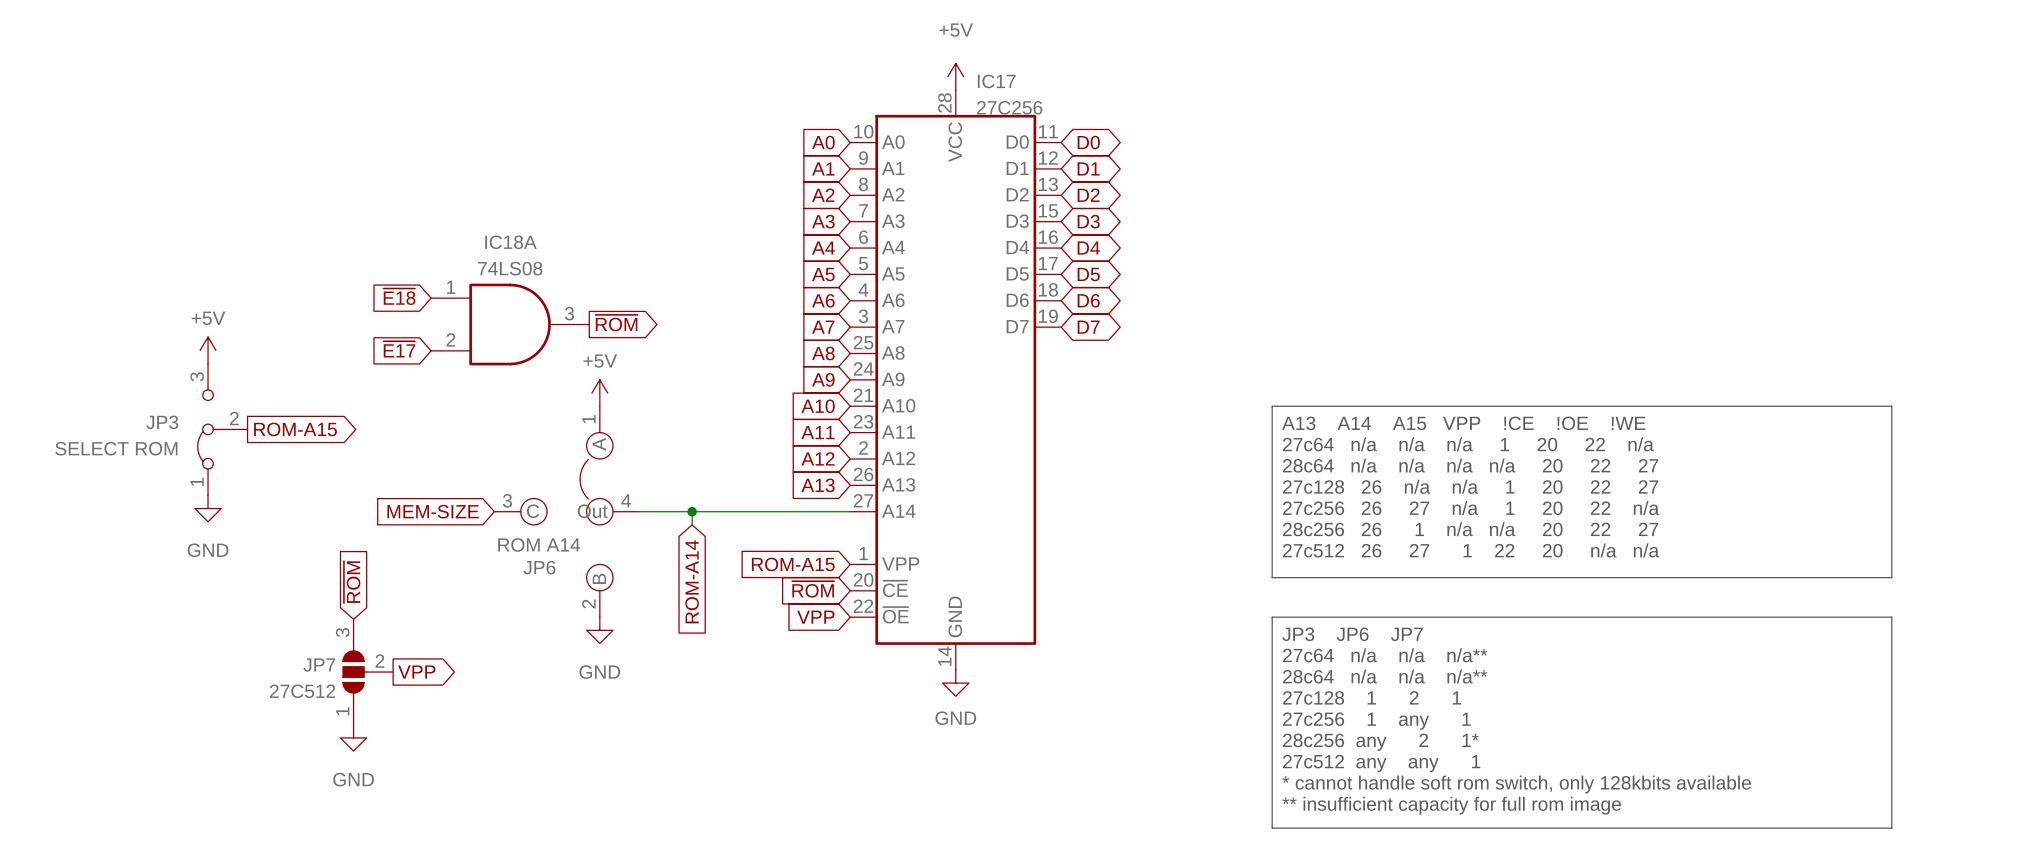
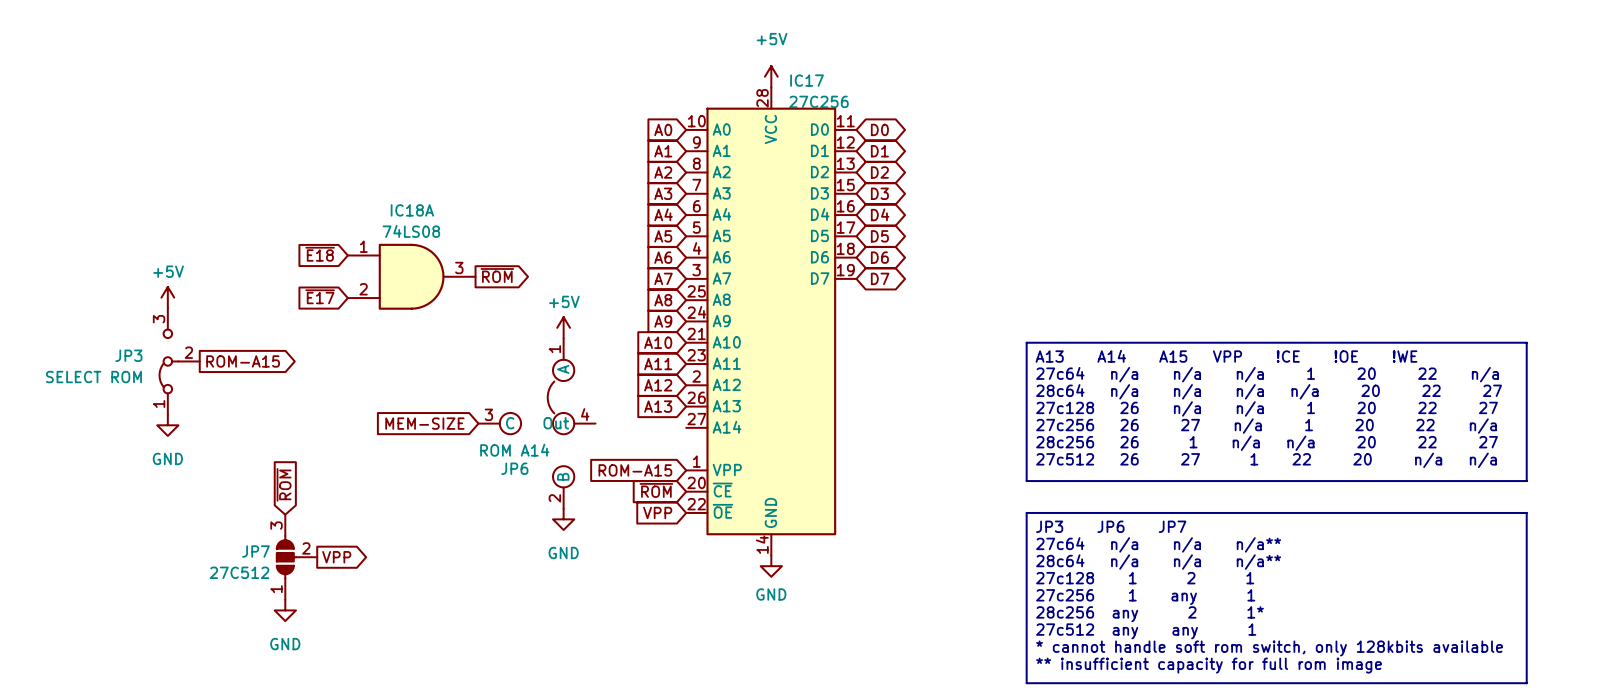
power symbol position: +5V (599, 393) -> +5V (563, 327)
global label position: MEM-SIZE (433, 511) -> MEM-SIZE (424, 423)
JP6 position: (566, 511) -> (537, 423)
wire: (639, 511) (850, 511) -> none
wire: (692, 511) (692, 524) -> none
junction: (692, 511) -> none
global label: ROM-A14 (692, 581) -> none
power symbol position: GND (599, 630) -> GND (563, 519)

